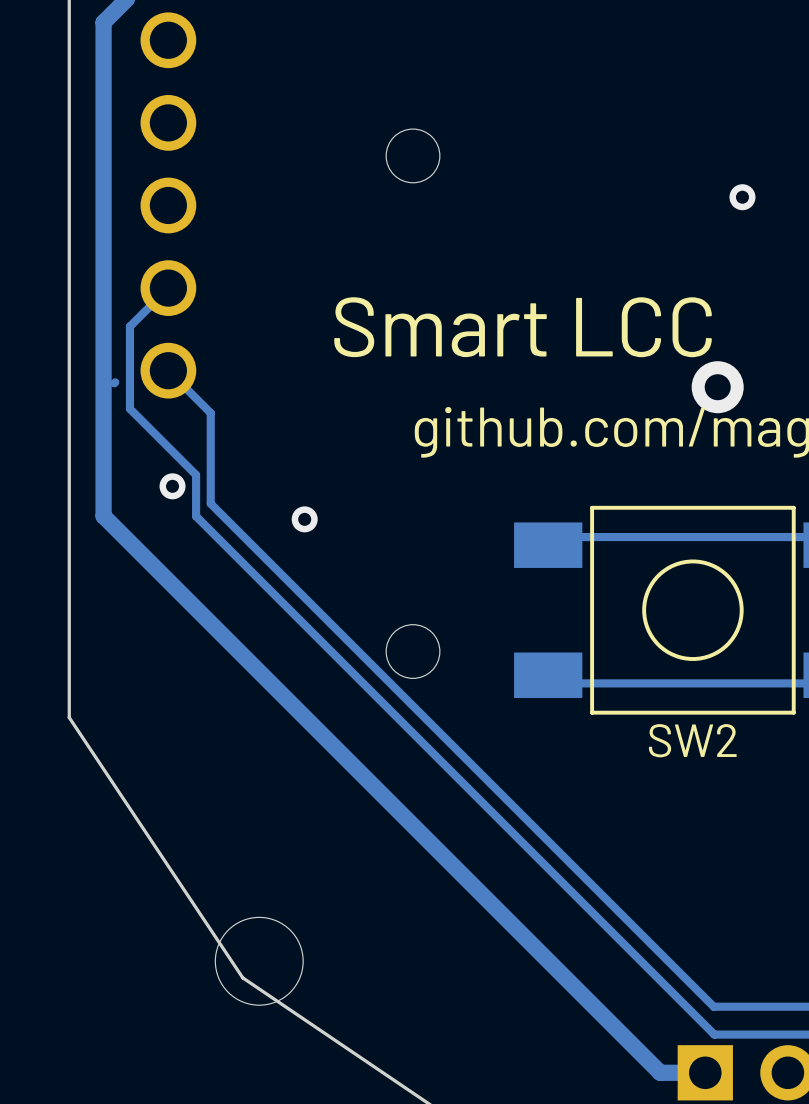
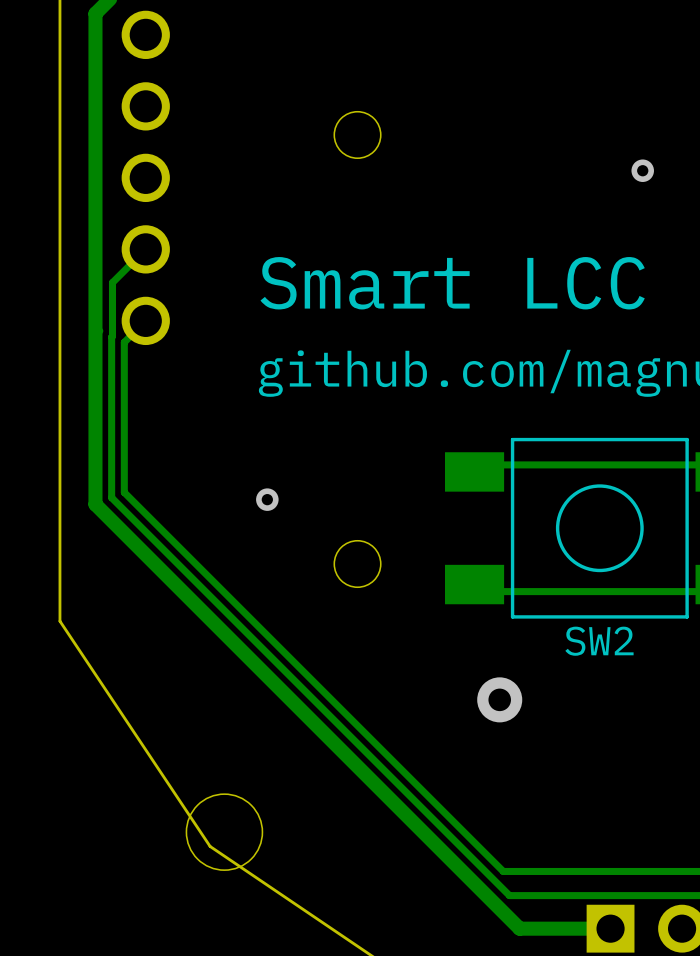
track: (110, 15) (103, 22) (103, 516) (660, 1072) -> (95, 13) (95, 504) (519, 928) (571, 928)
track: (168, 370) (210, 413) (210, 503) (713, 1006) -> (145, 320) (124, 342) (124, 492) (503, 871) (617, 871)
via: (717, 387) -> none
track: (129, 388) (129, 408) (196, 475) (196, 516) (714, 1034) -> (112, 336) (111, 497) (509, 895) (618, 895)
via: (172, 486) -> none
via position: (304, 519) -> (267, 499)
via: none -> (499, 699)

